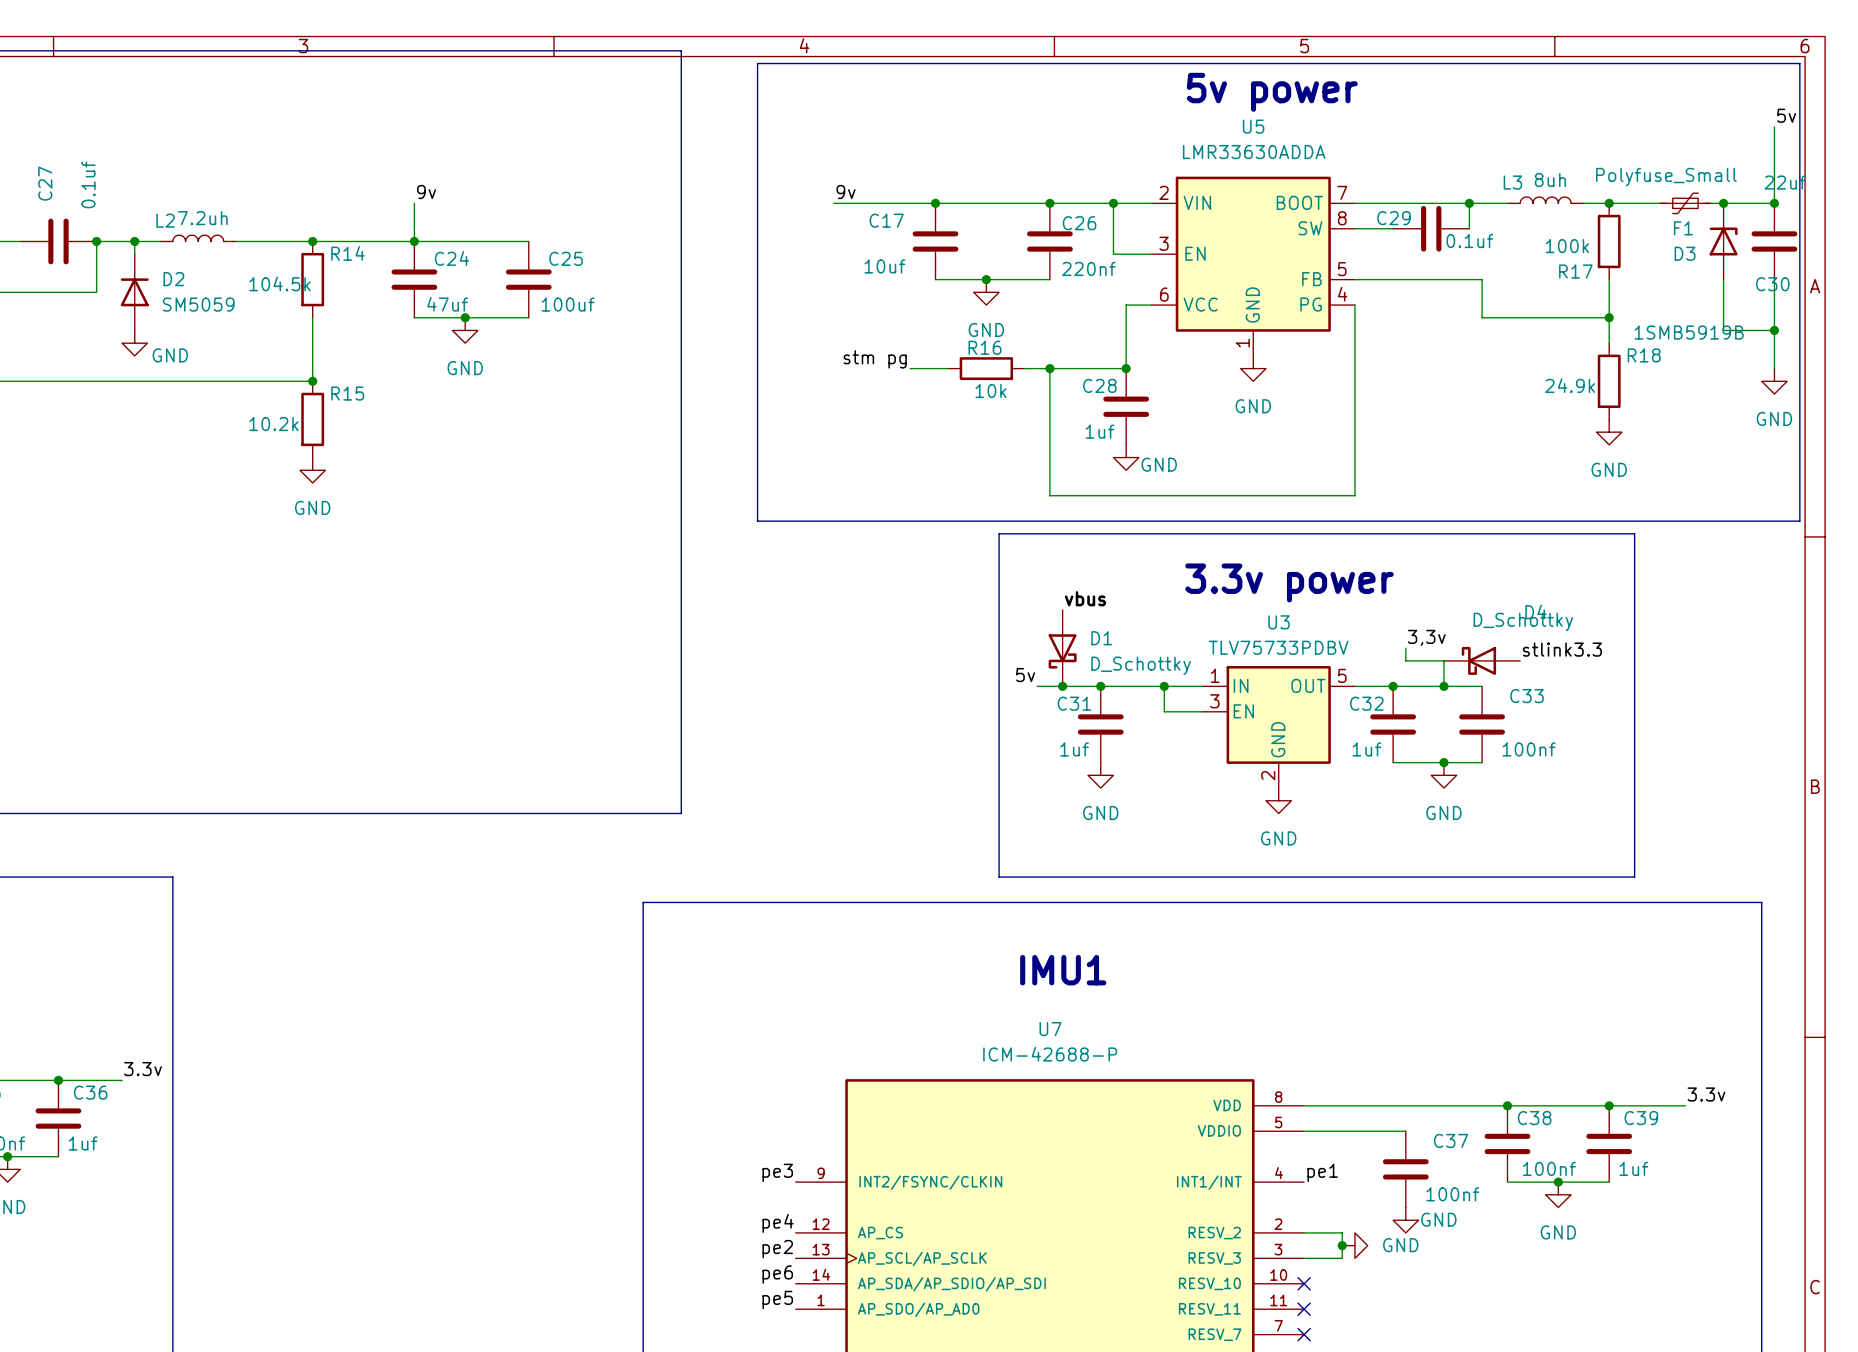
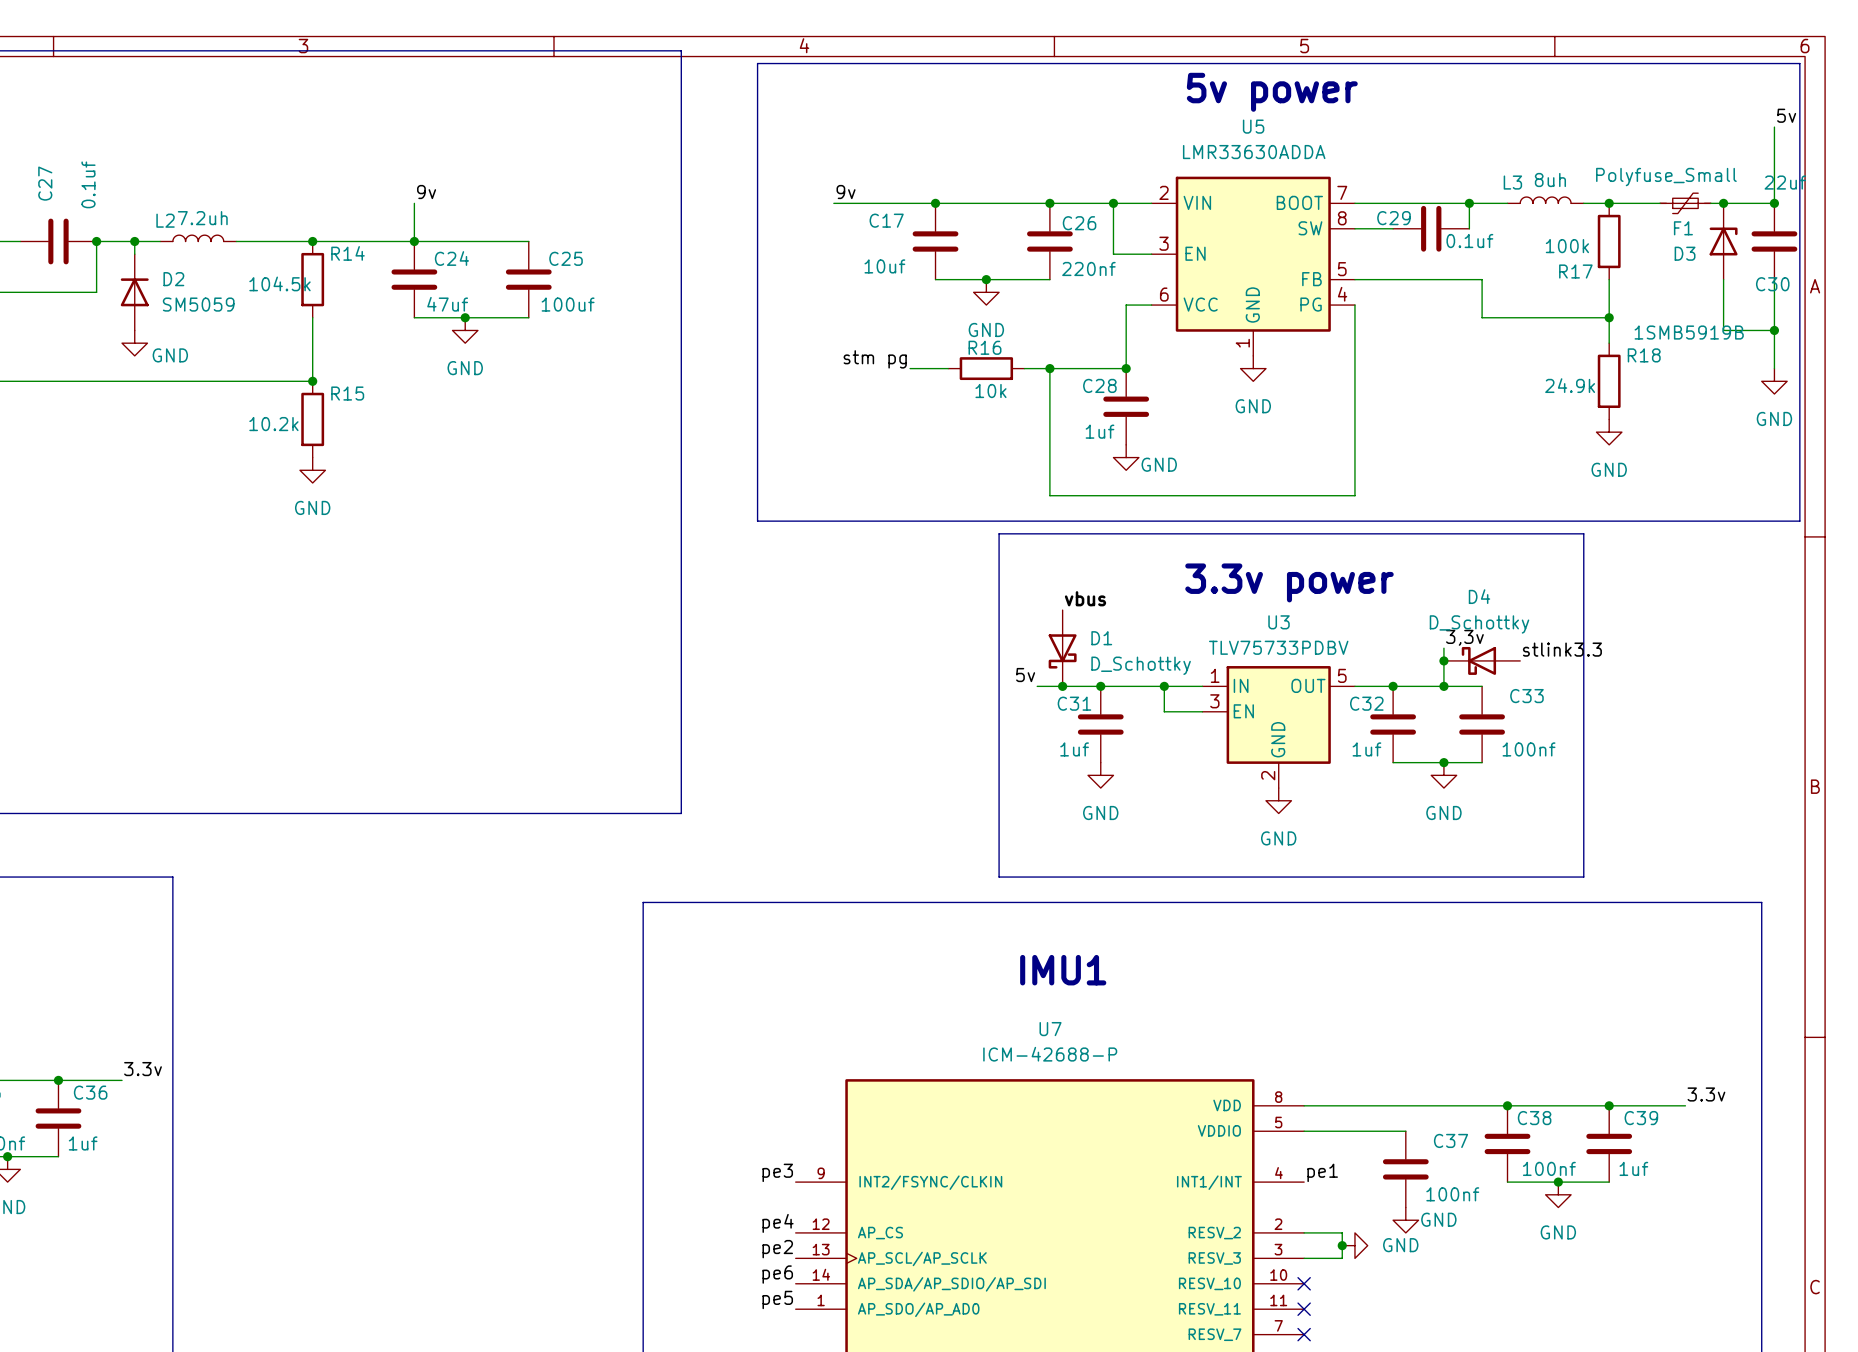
line: (1583, 533) (1634, 533) (1634, 877) (1583, 877) -> (1583, 533) (1583, 877)
D4 name position: D4 (1536, 611) -> D4 (1479, 596)
D4 value position: D_Schottky (1523, 621) -> D_Schottky (1479, 624)
label position: 3,3v (1426, 637) -> 3,3v (1464, 637)
wire: (1405, 648) (1405, 660) (1443, 660) -> (1443, 648) (1443, 660)
junction: none -> (1443, 660)

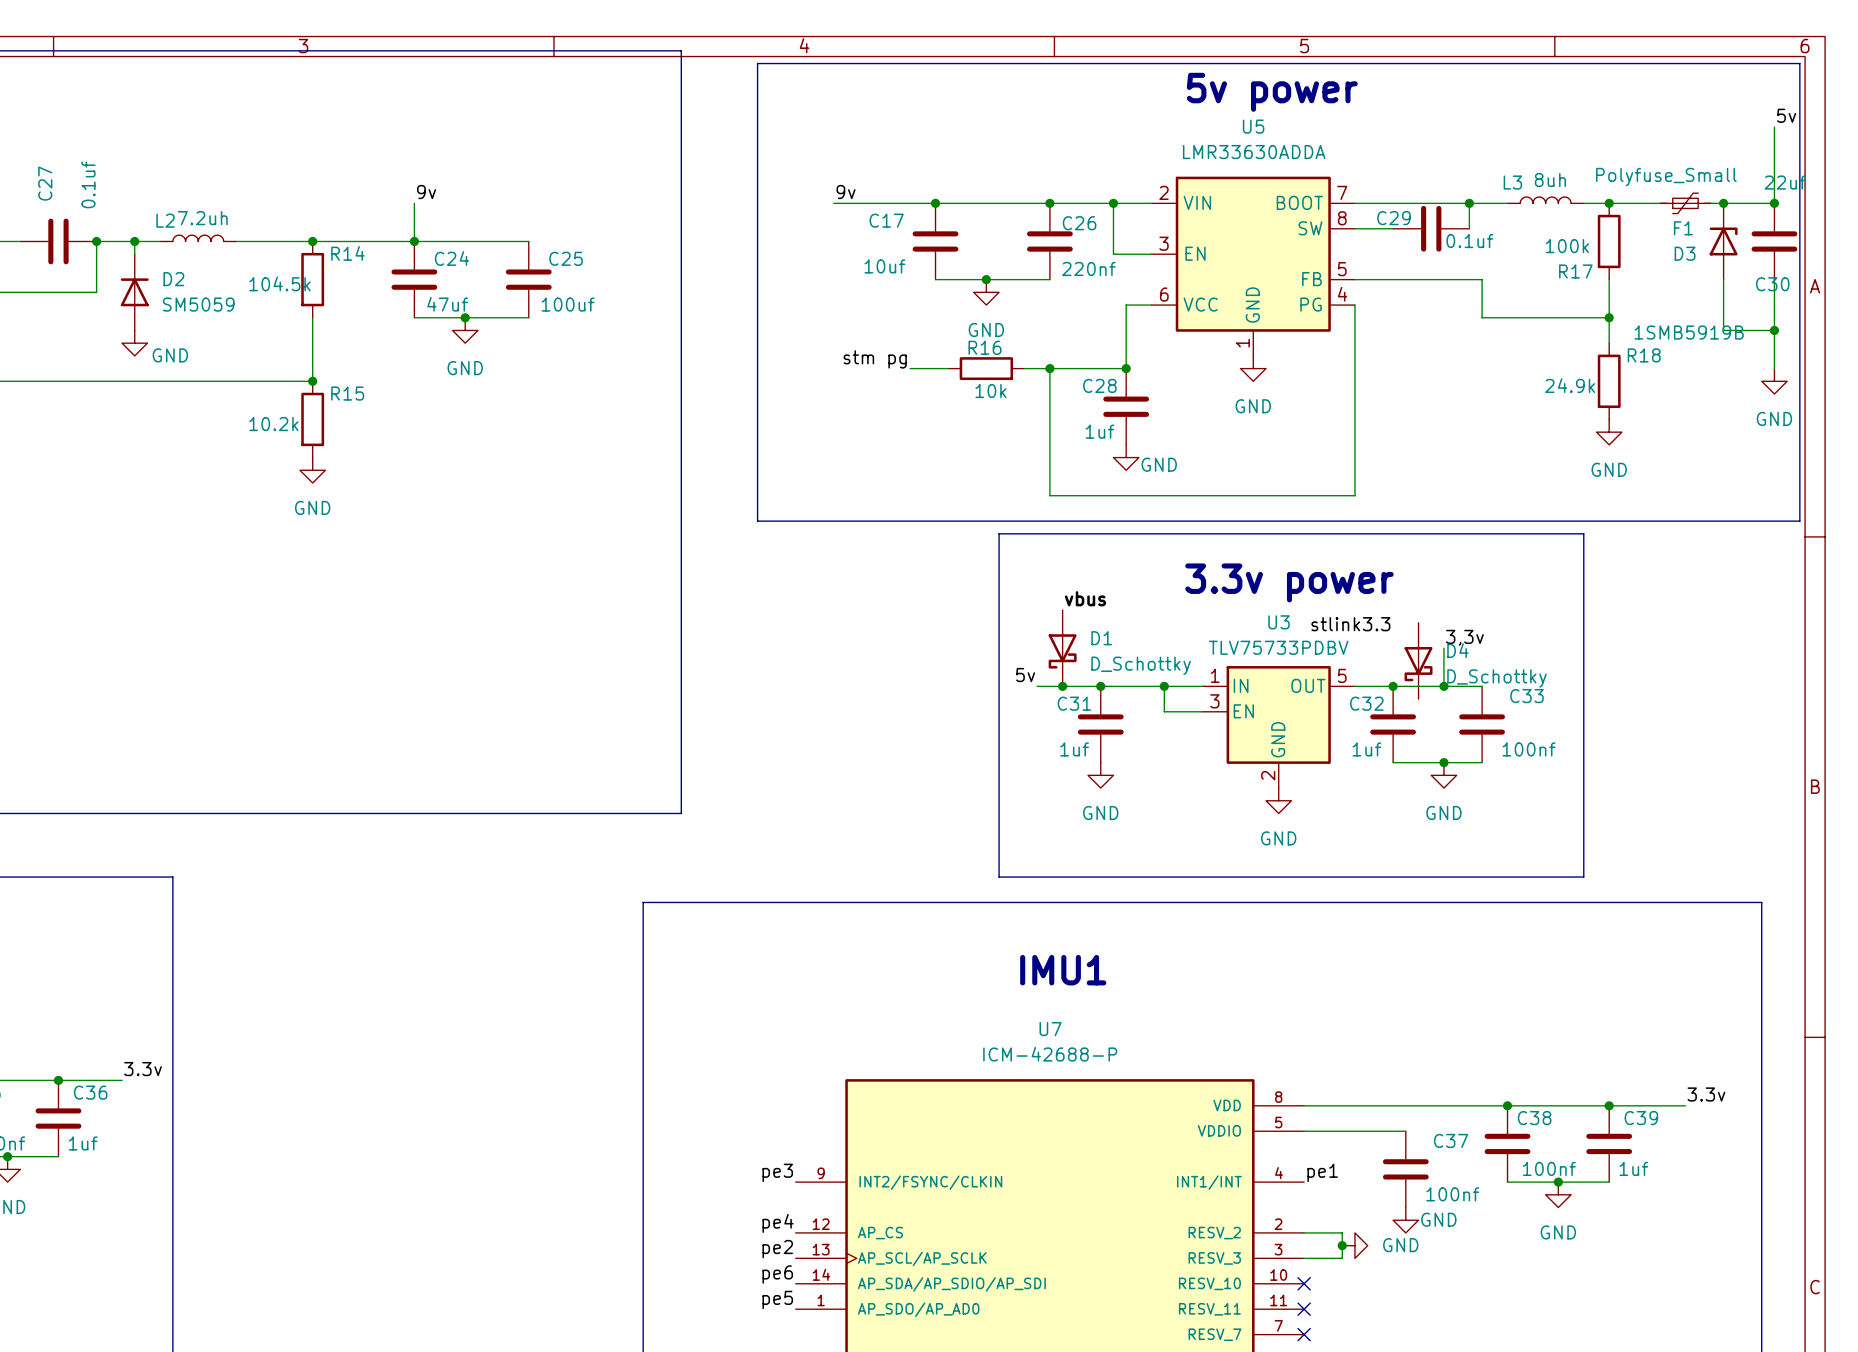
D4 name position: D4 (1479, 596) -> D4 (1457, 650)
D4 value position: D_Schottky (1479, 624) -> D_Schottky (1497, 678)
label position: stlink3.3 (1562, 649) -> stlink3.3 (1350, 624)
junction: (1443, 660) -> none
D4 rotation: 0° (1478, 660) -> 90° counterclockwise (1418, 664)
D4 position: (1482, 660) -> (1418, 660)

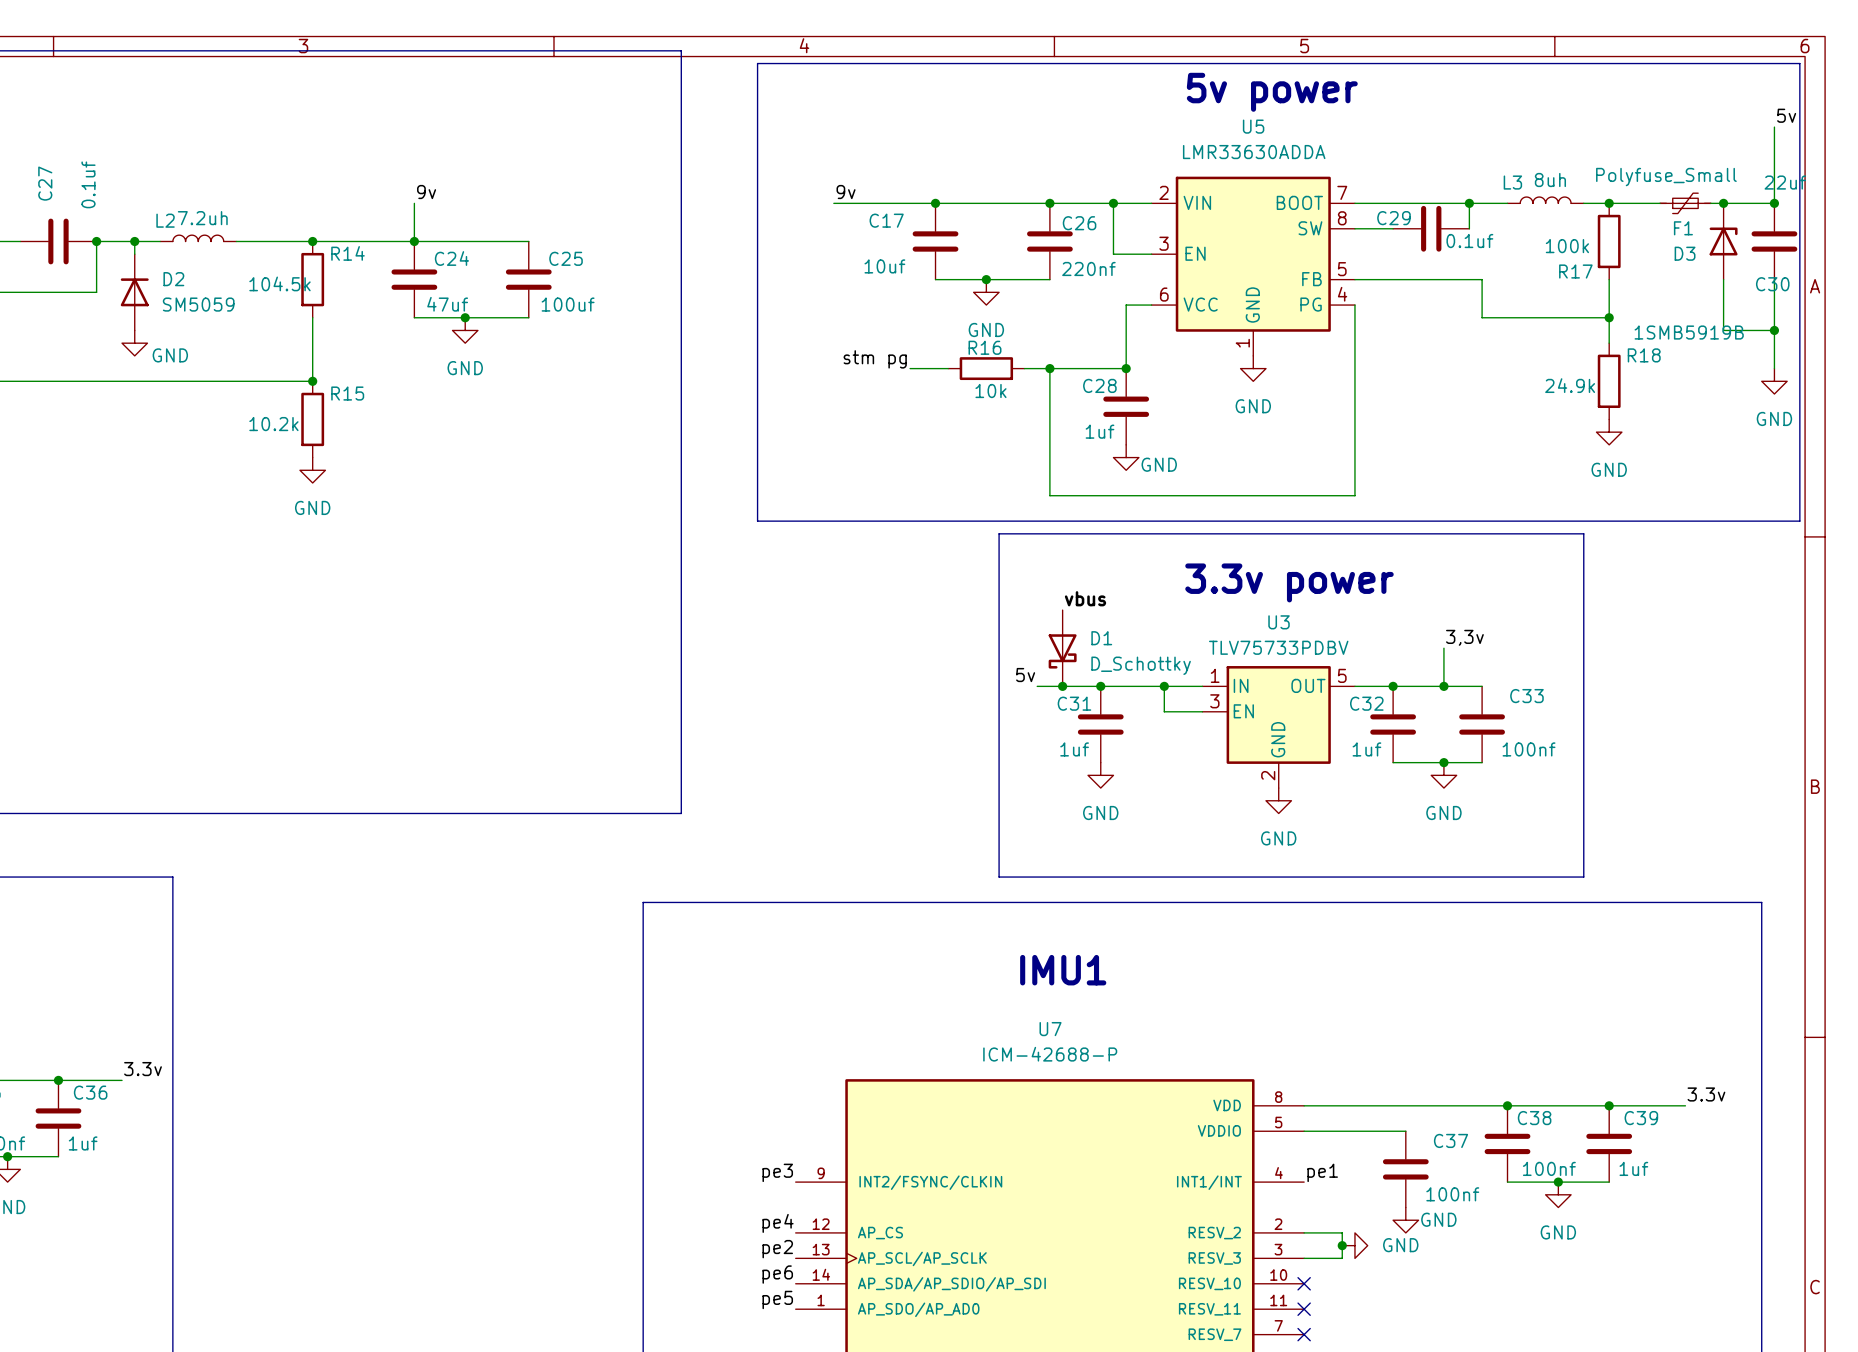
label: stlink3.3 (1350, 624) -> none
D4: D_Schottky (1418, 660) -> none

